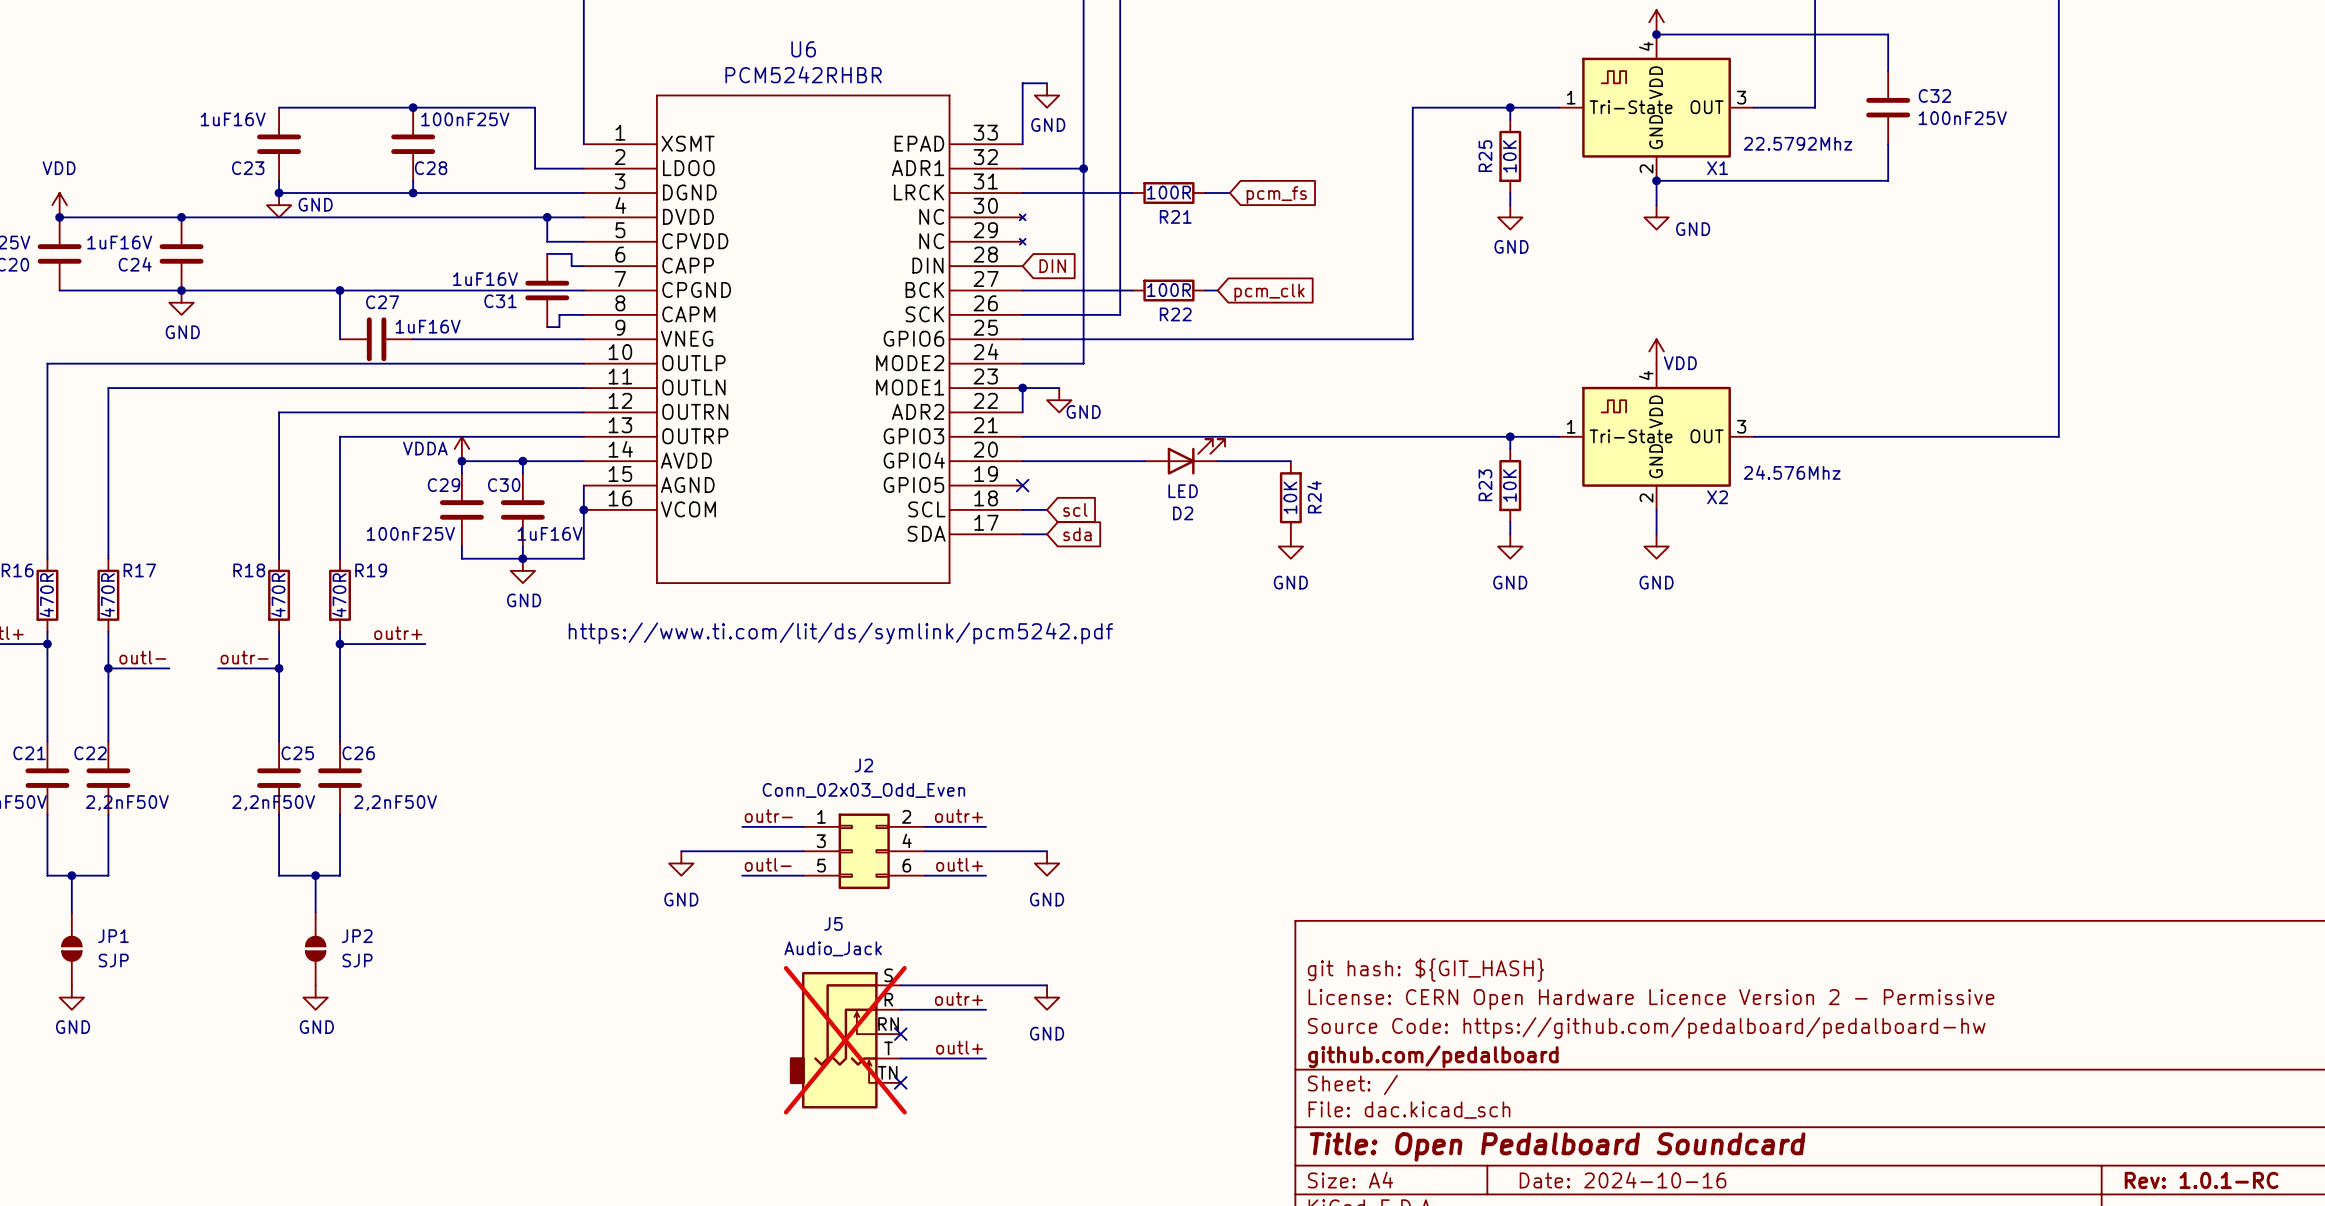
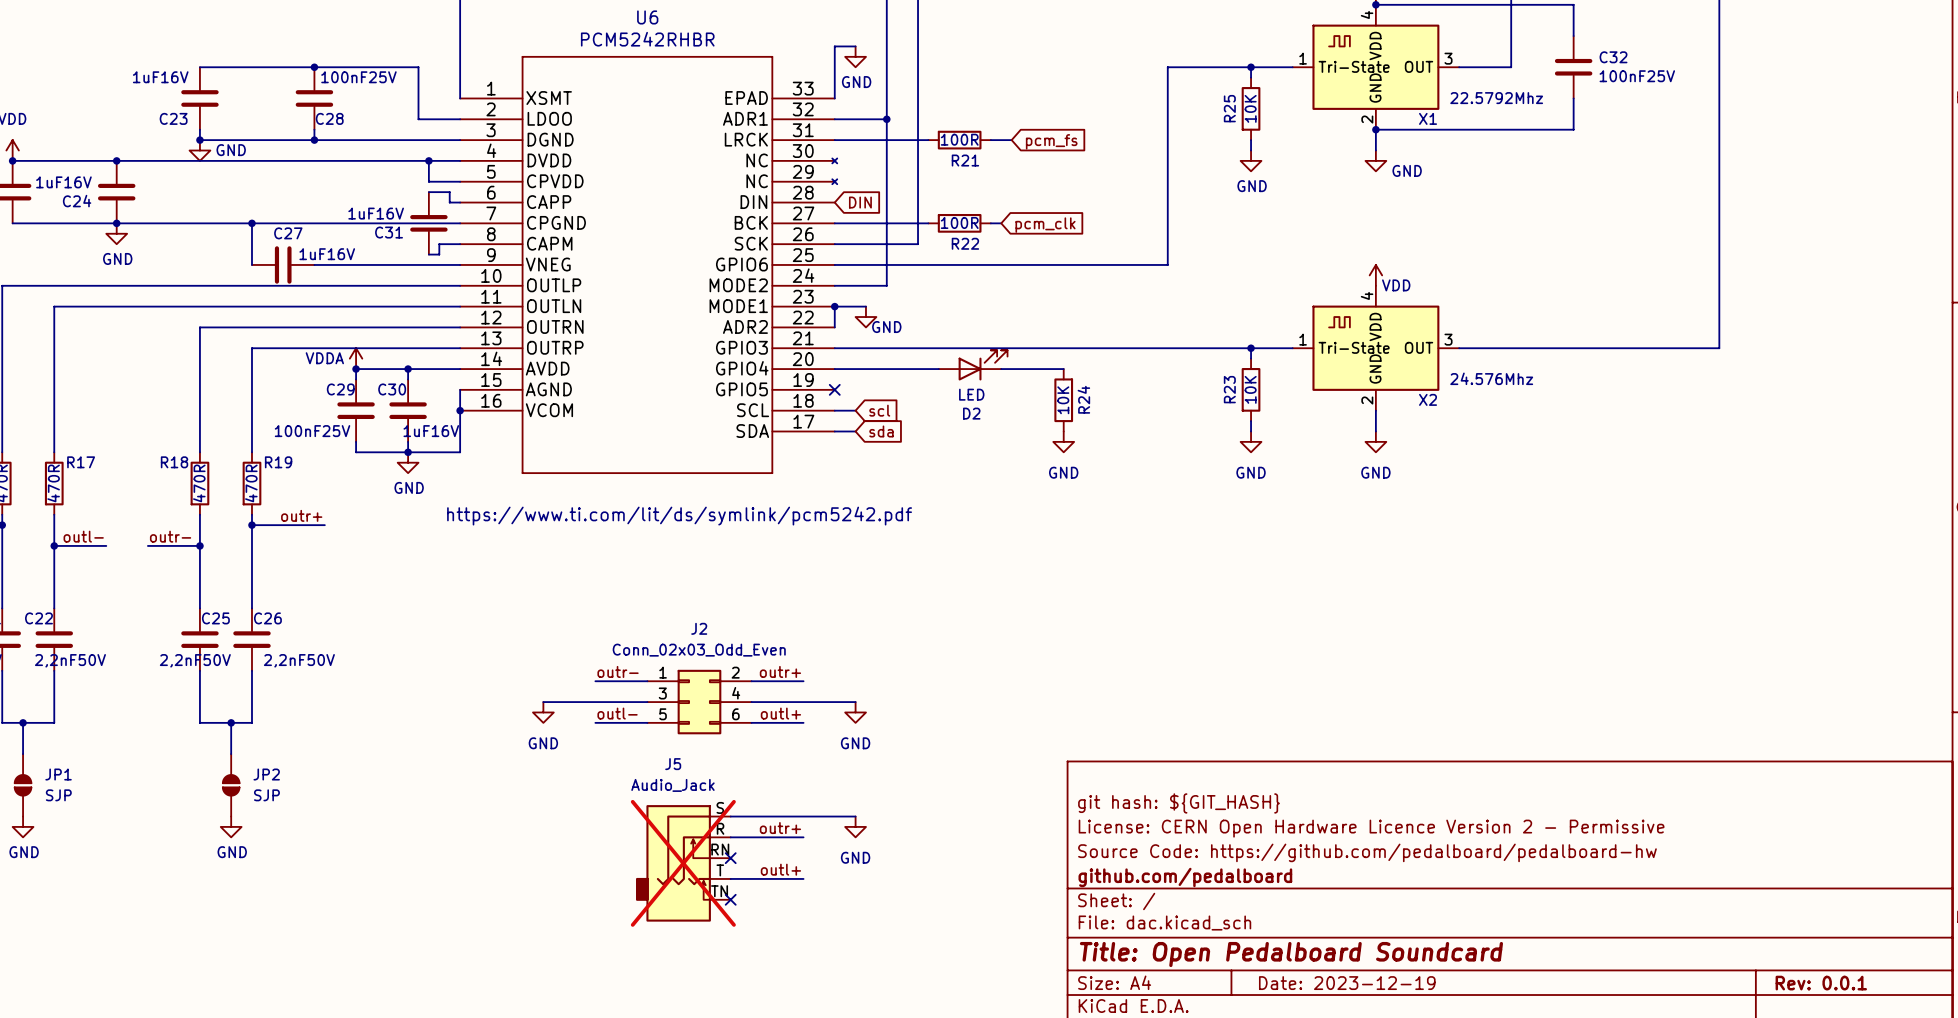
title block: Date: 2024-10-16 (1623, 1180) -> Date: 2023-12-19 (1347, 983)
title block: Rev: 1.0.1-RC (2201, 1180) -> Rev: 0.0.1 (1821, 983)

